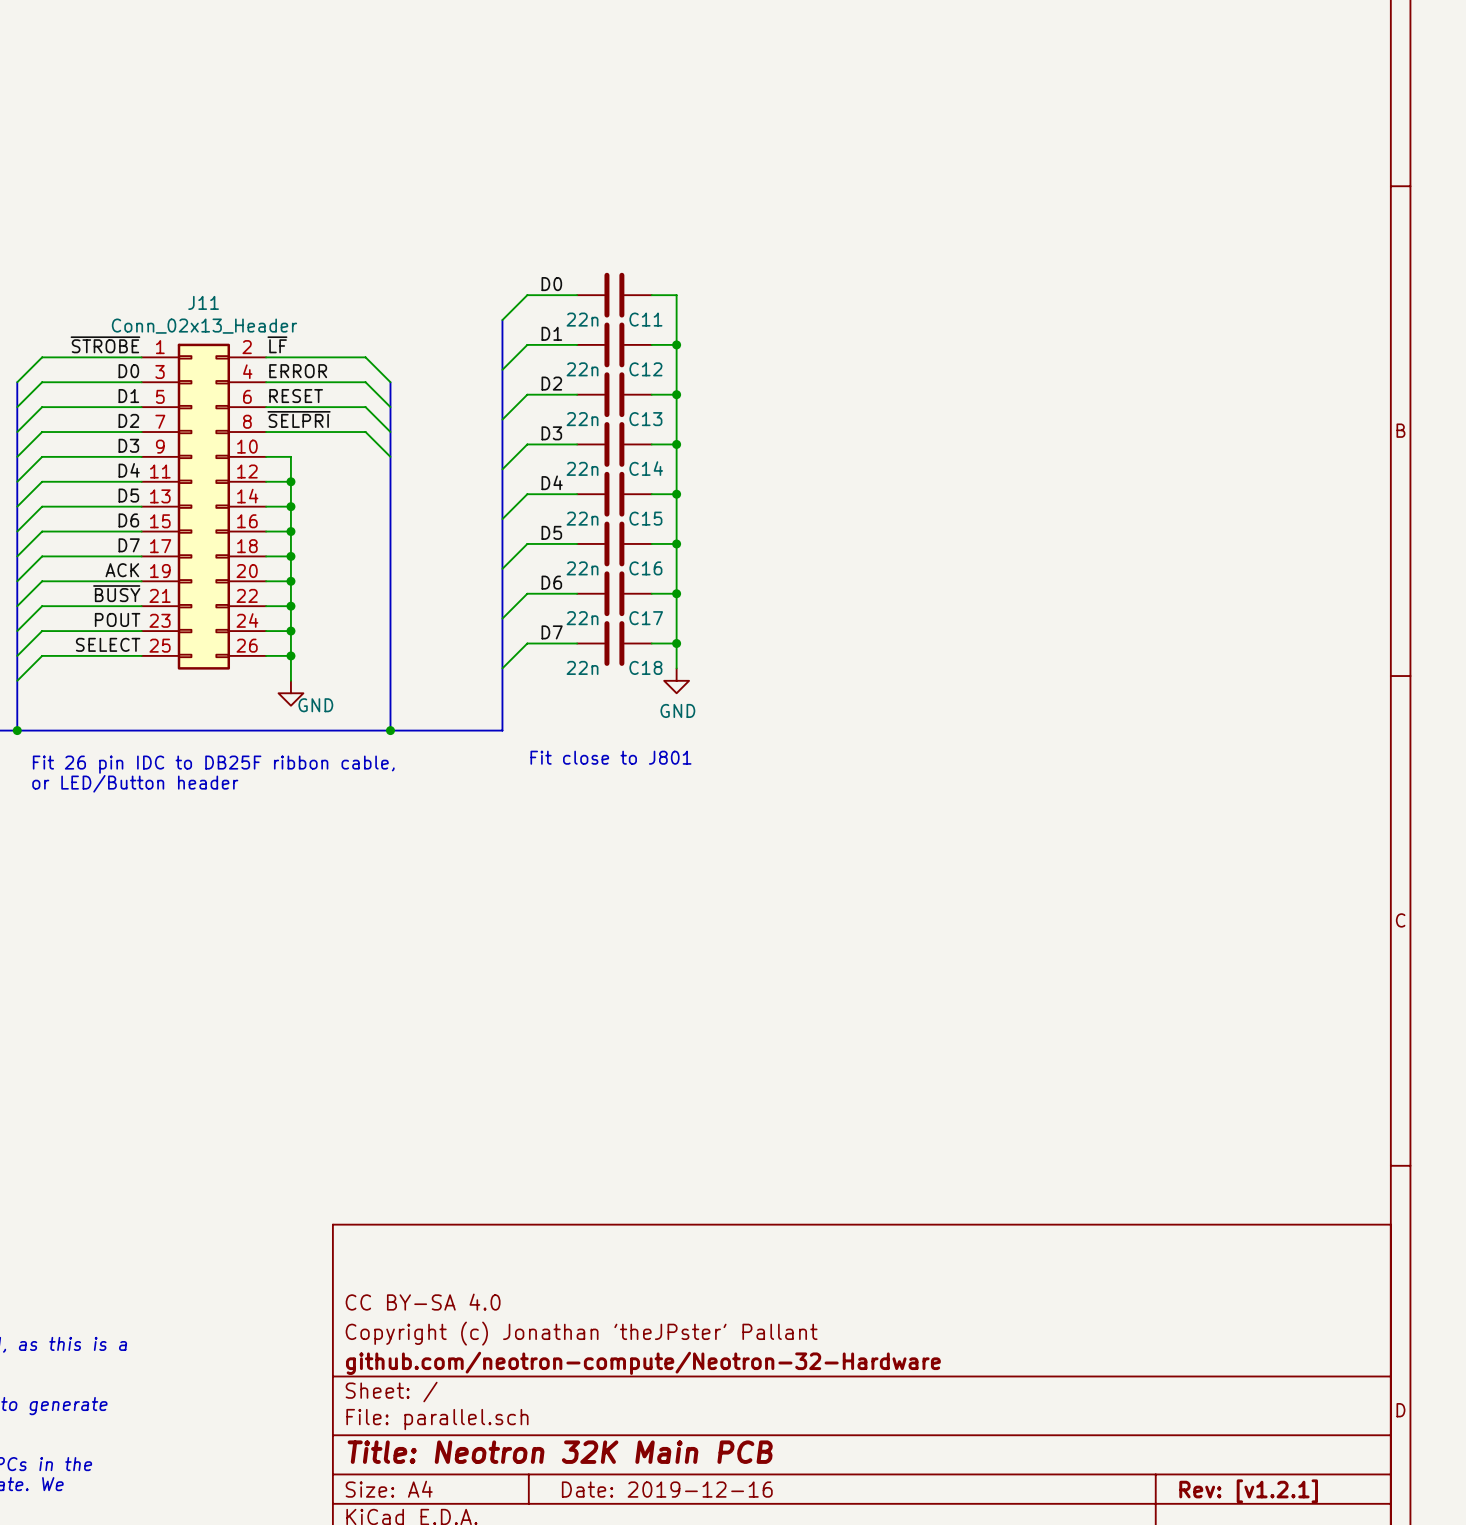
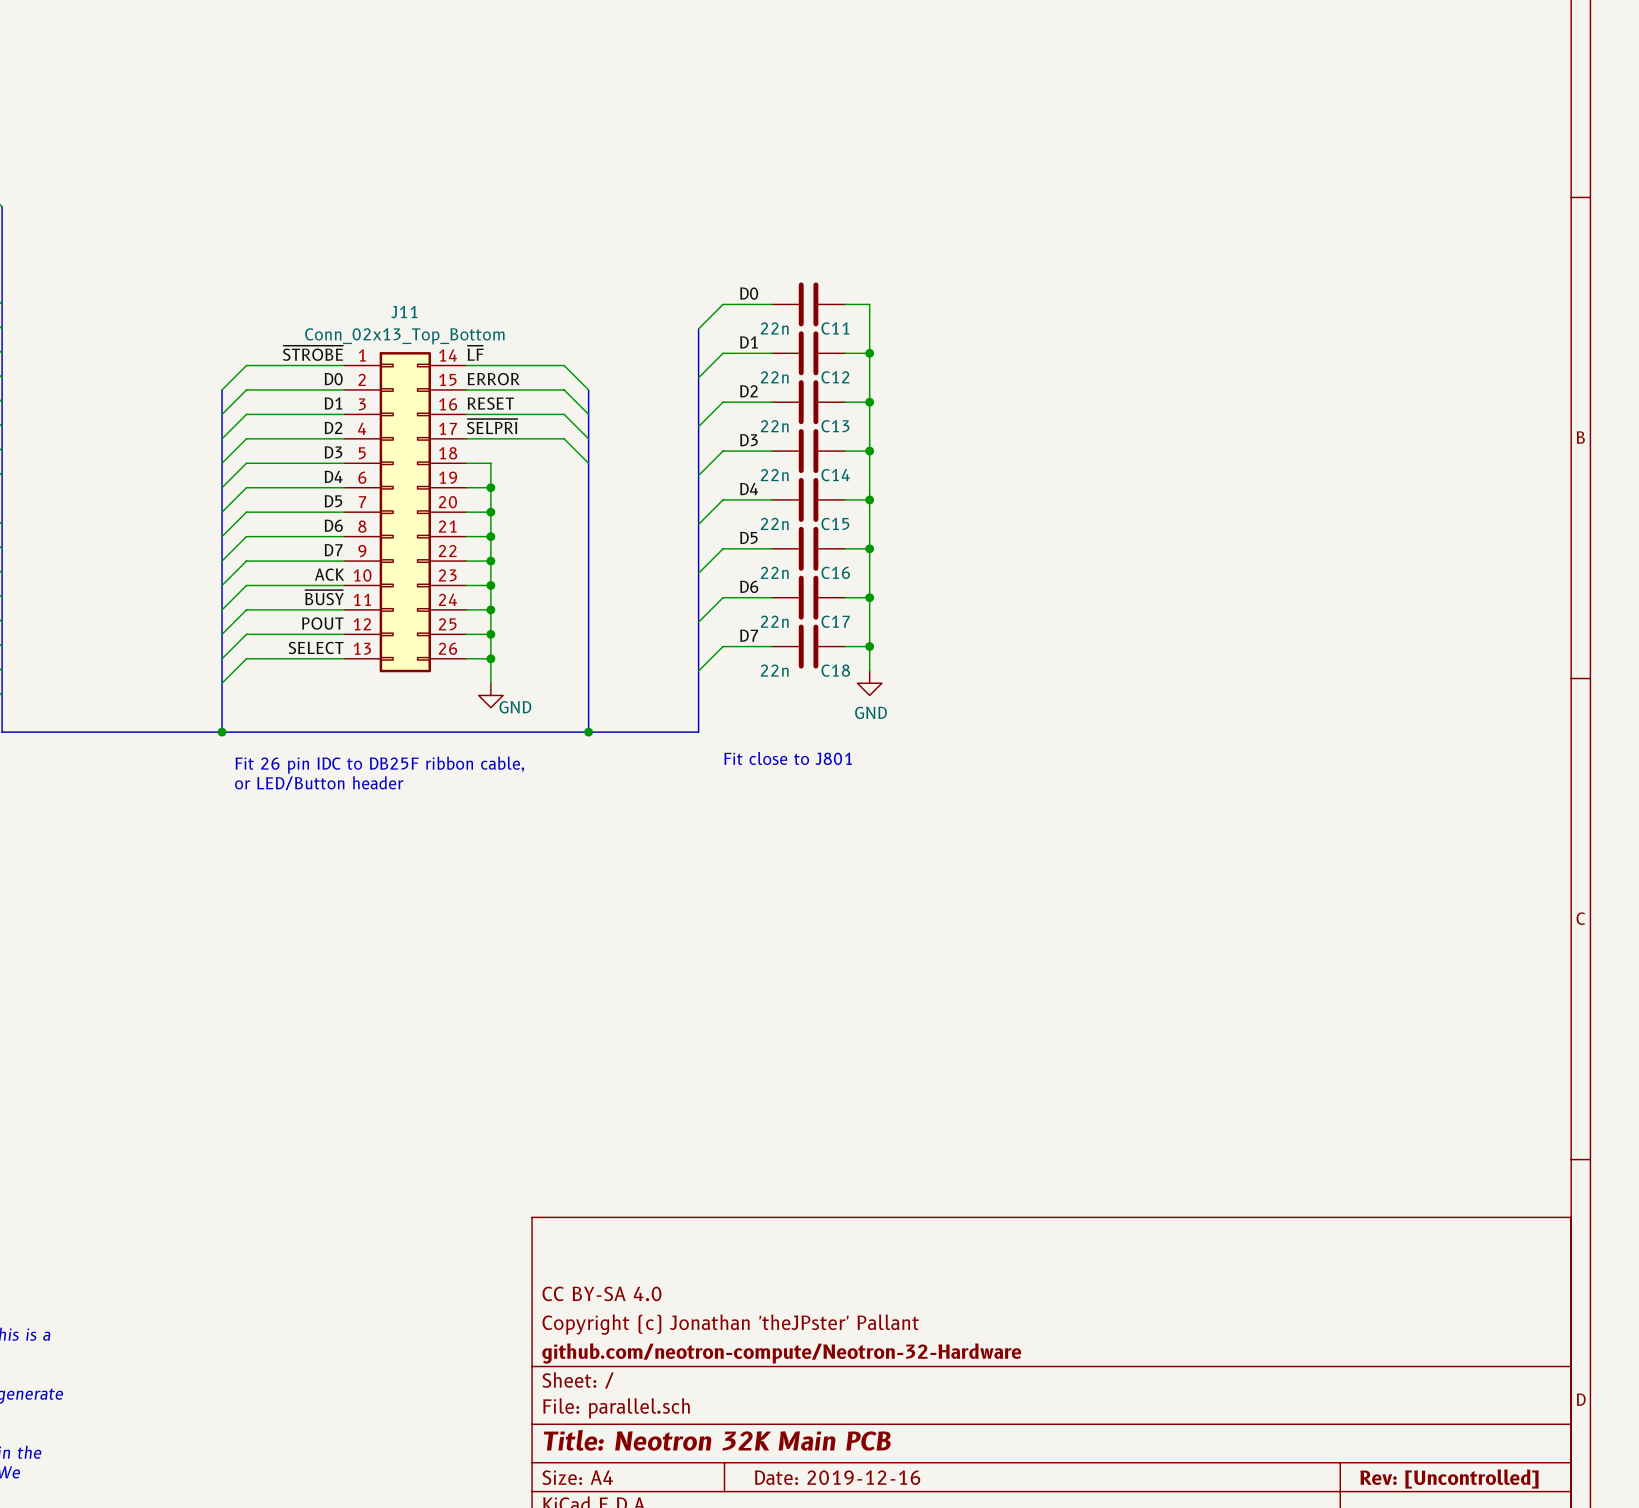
J11 value: Conn_02x13_Header (204, 326) -> Conn_02x13_Top_Bottom (404, 336)
J11 symbol: [141, 343, 267, 670] -> [344, 352, 467, 673]
title block: Rev: [v1.2.1] (1248, 1491) -> Rev: [Uncontrolled] (1449, 1478)

